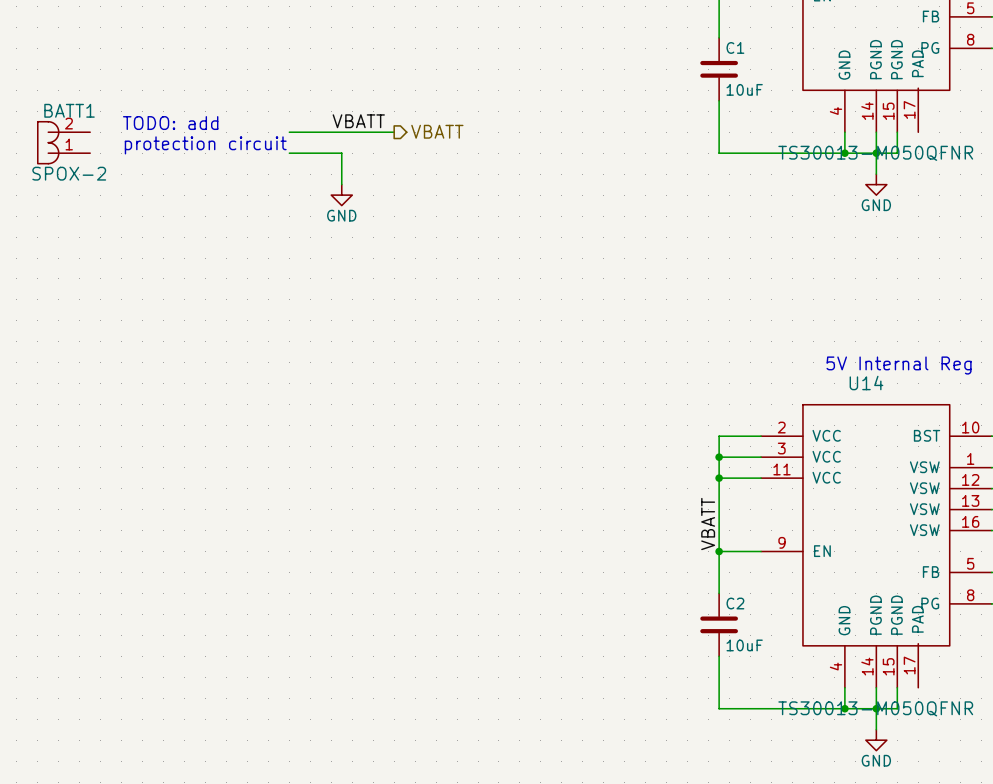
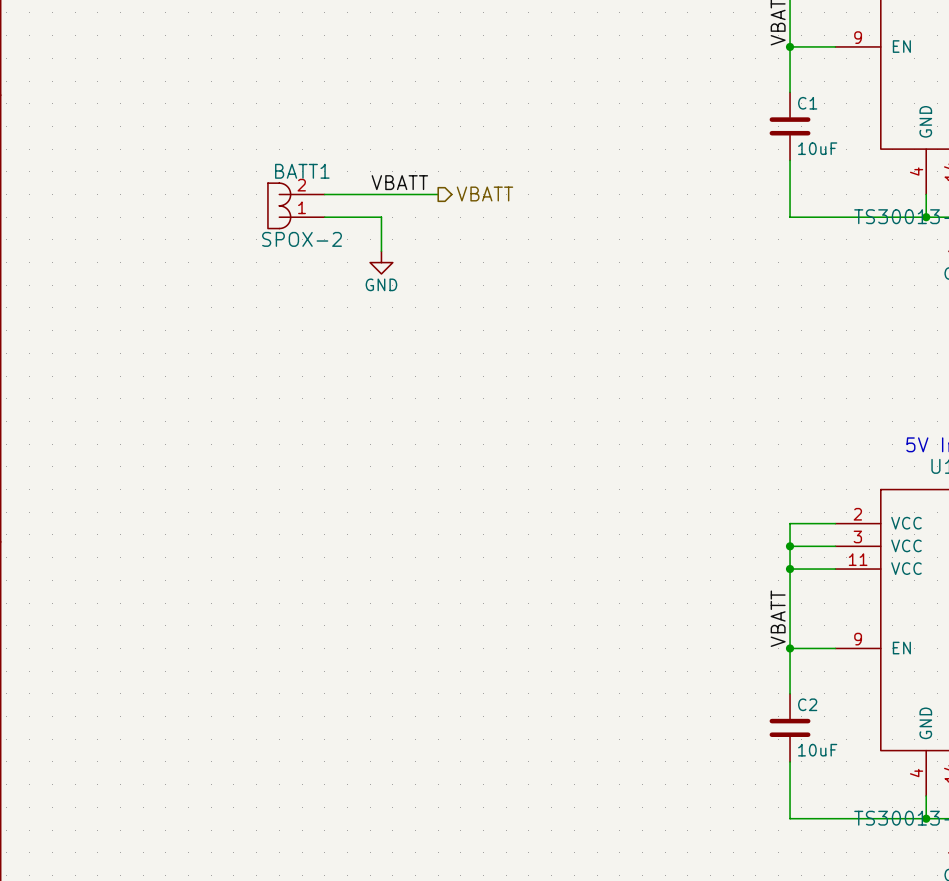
text: TODO: add (170, 123) -> none
BATT1 position: (63, 142) -> (296, 205)
text: protection circuit (205, 145) -> none

